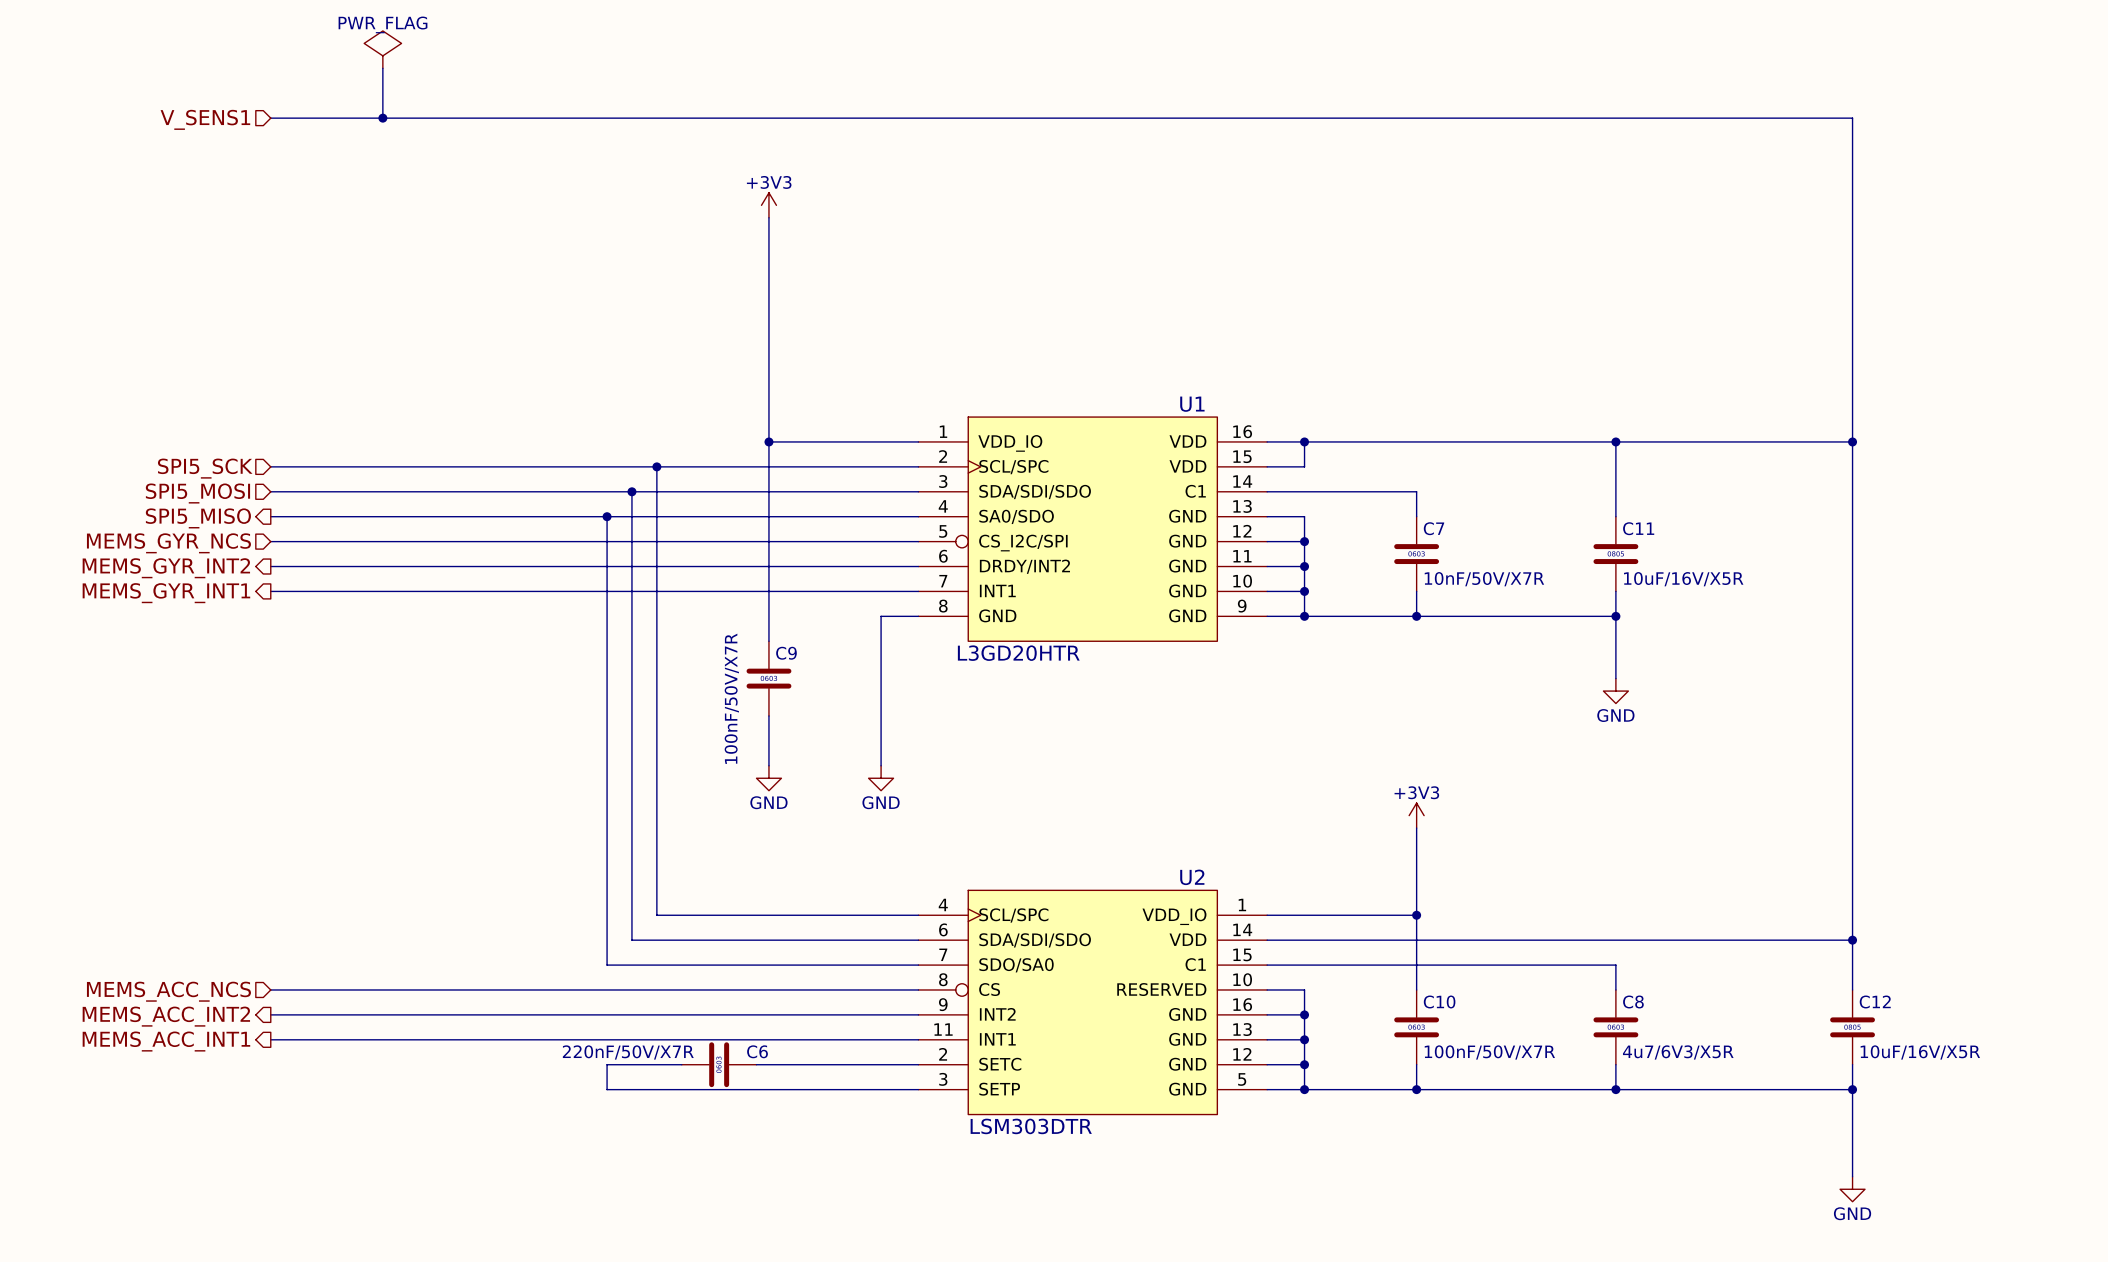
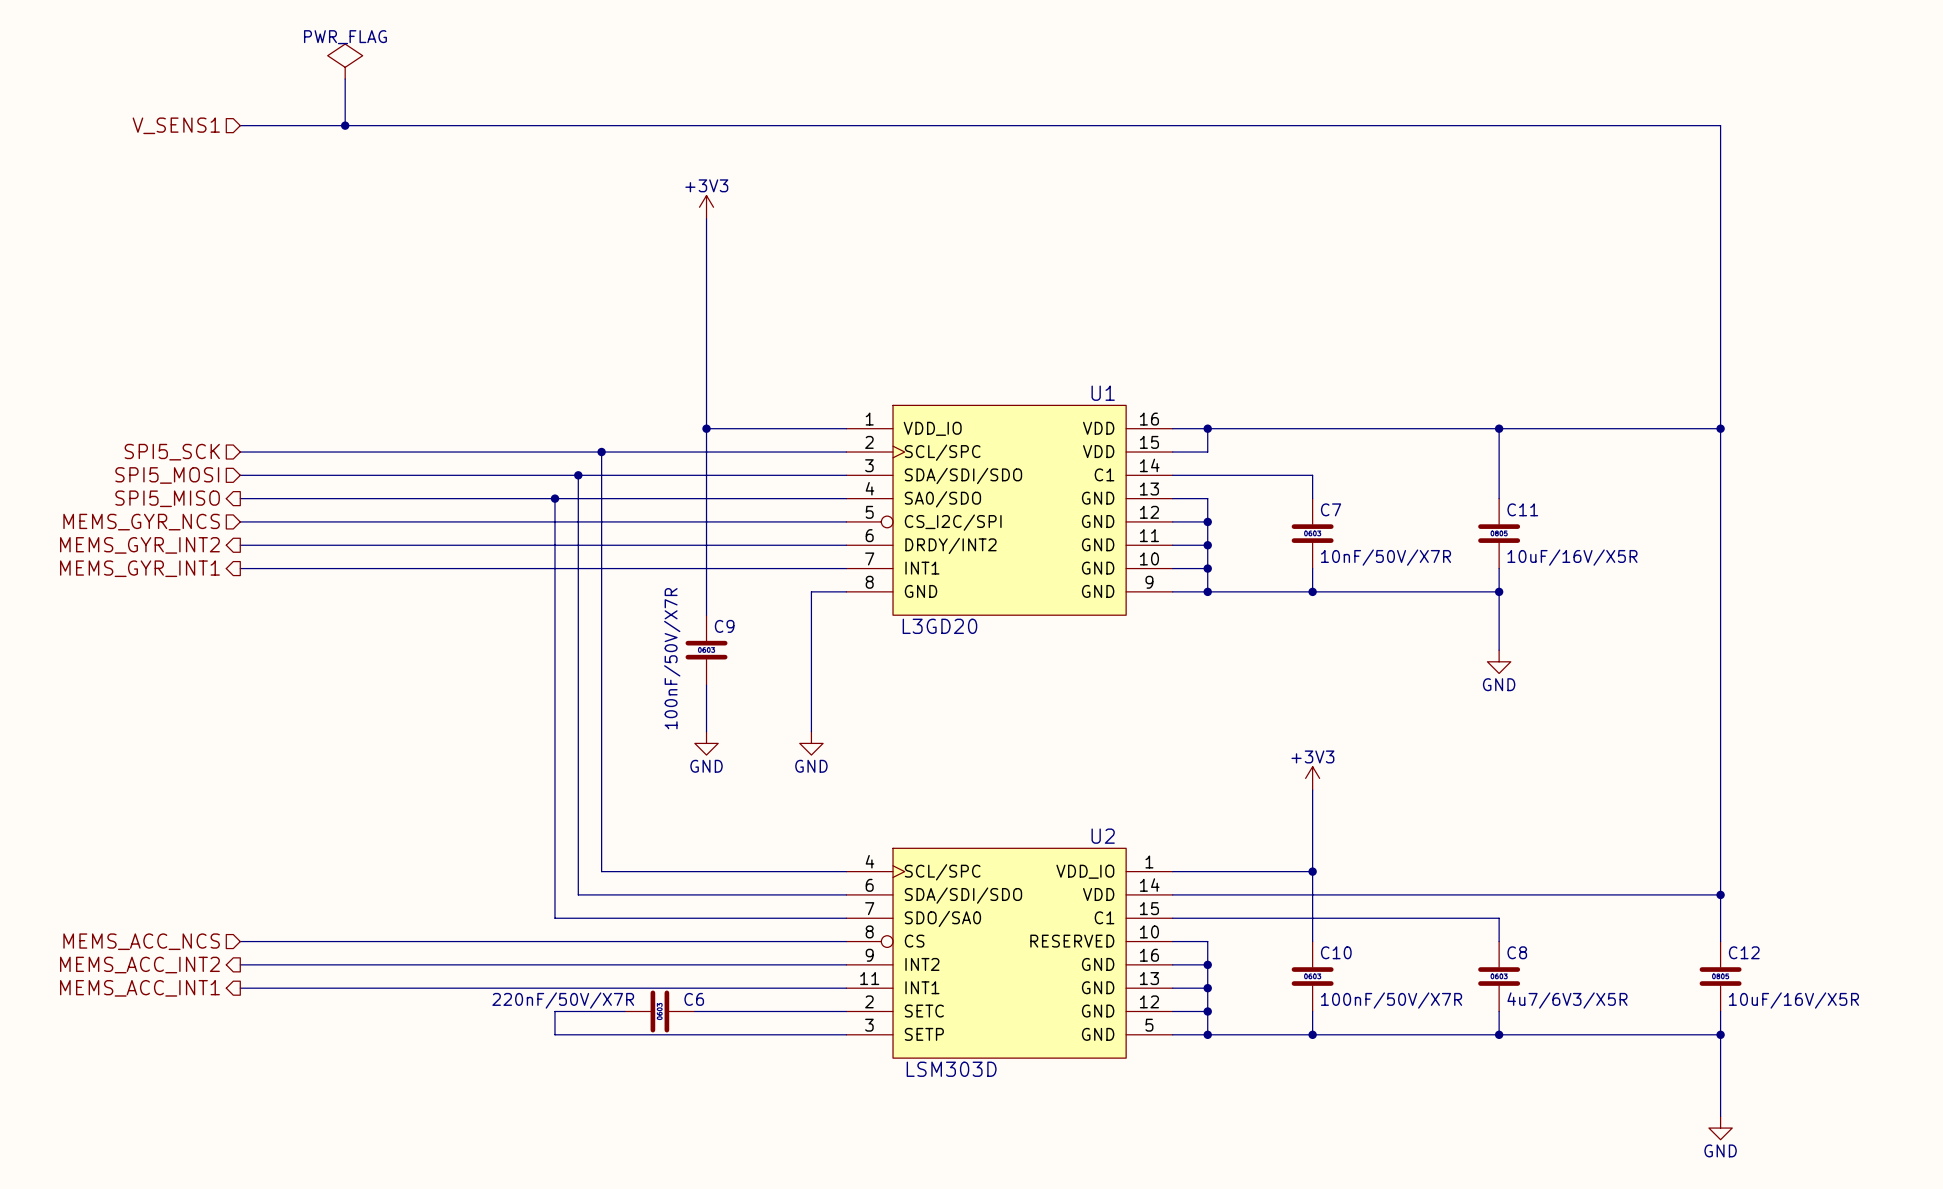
U1 value: L3GD20HTR (1018, 653) -> L3GD20 (939, 626)
U2 value: LSM303DTR (1031, 1126) -> LSM303D (951, 1069)

